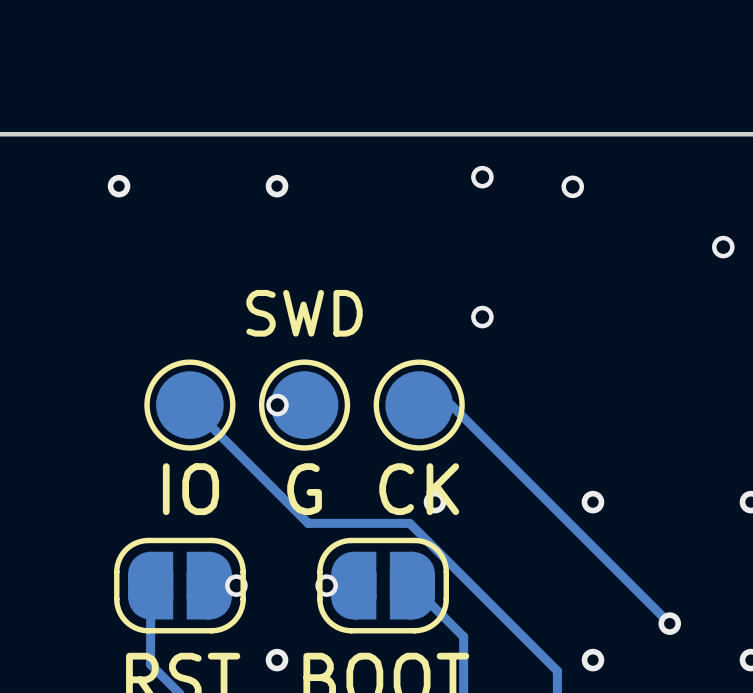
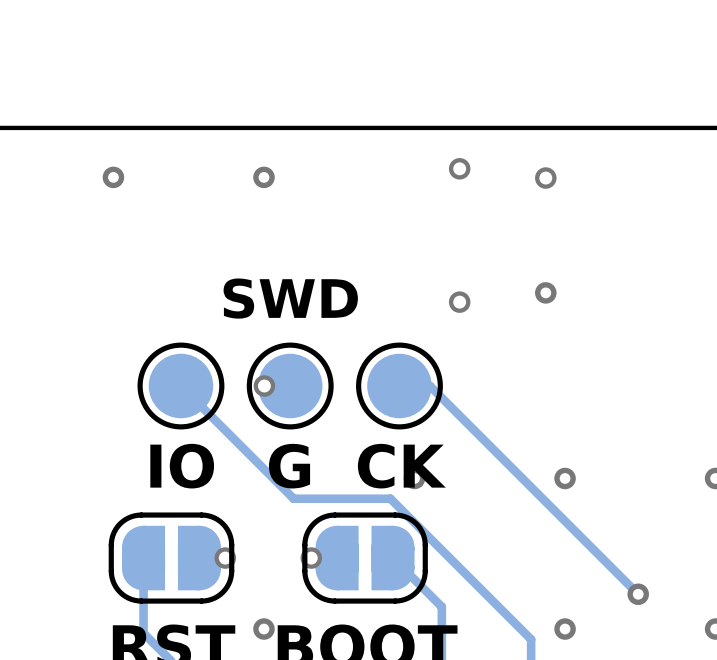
via: (723, 247) -> none
via: none -> (545, 292)

